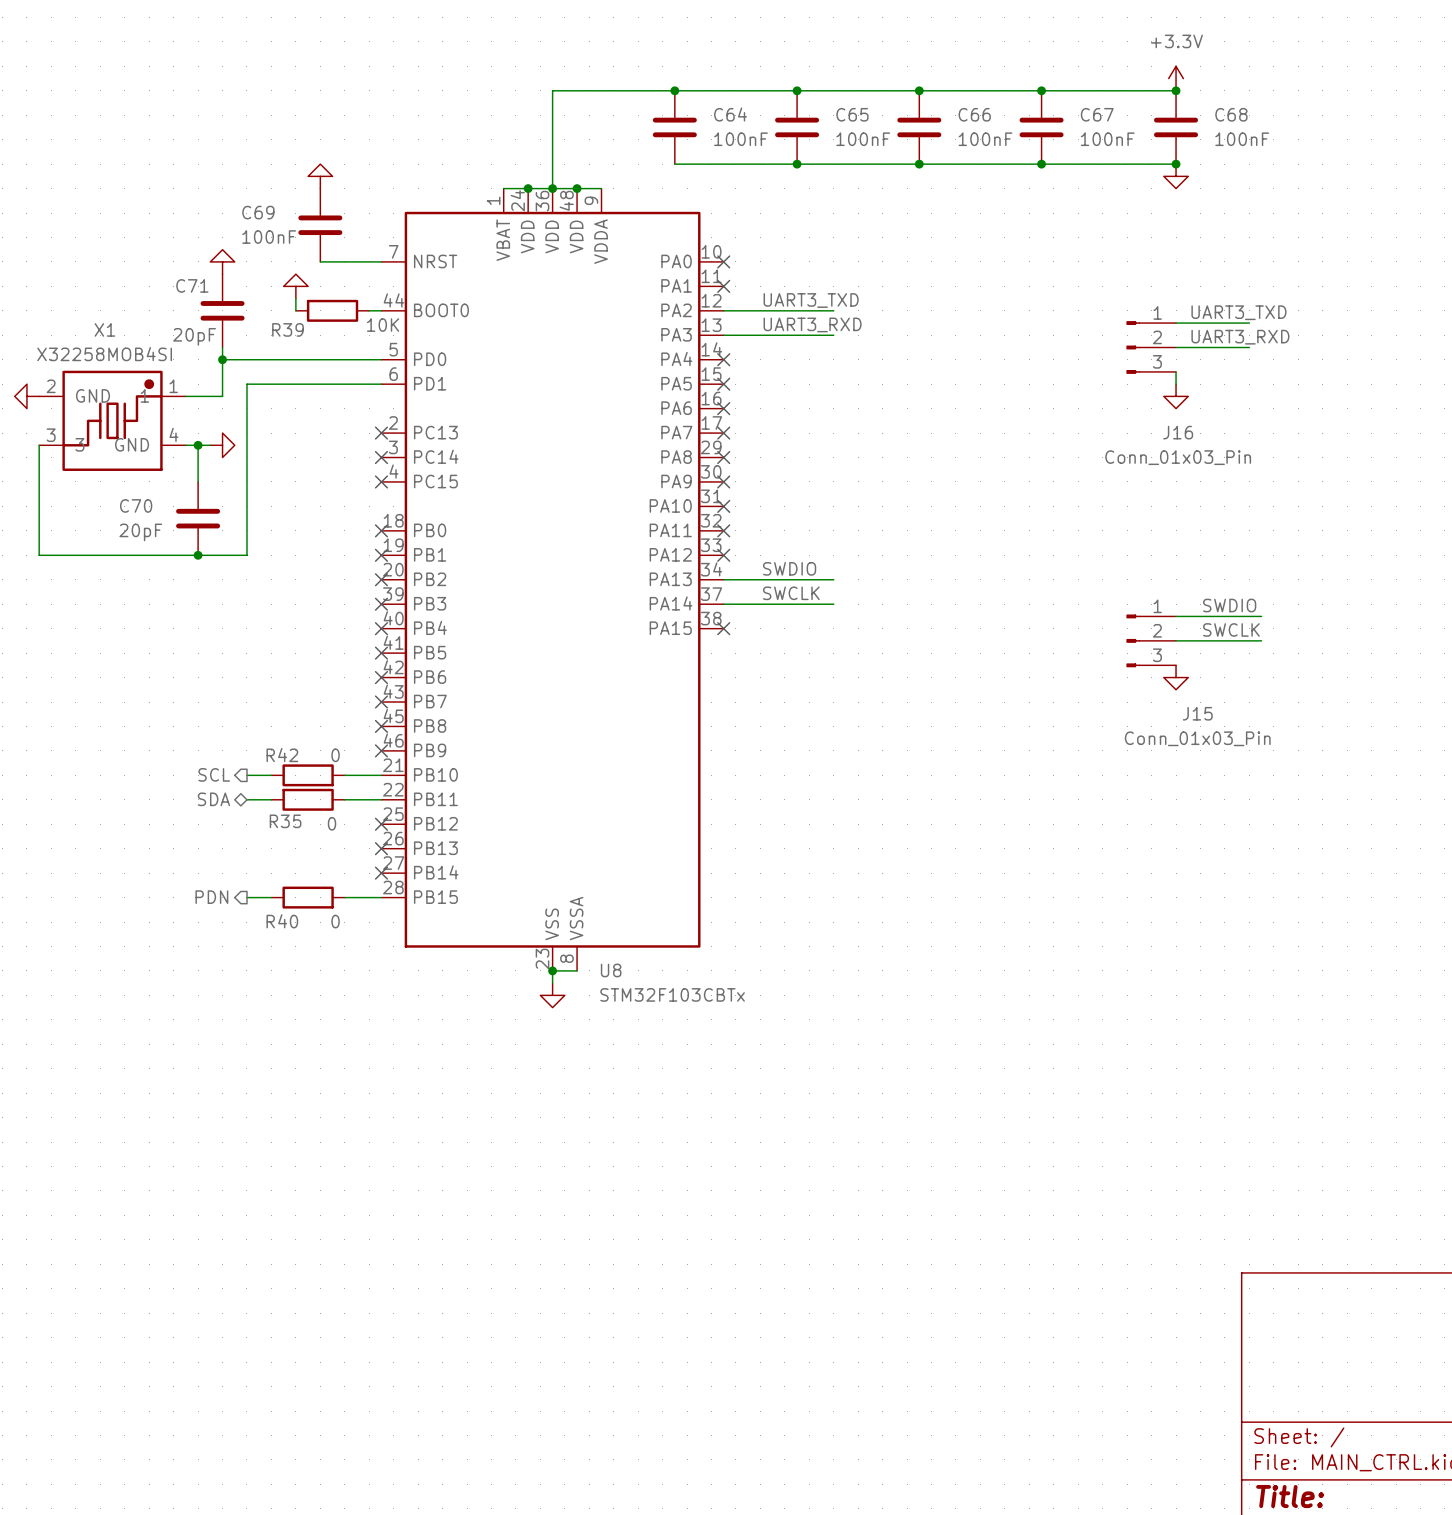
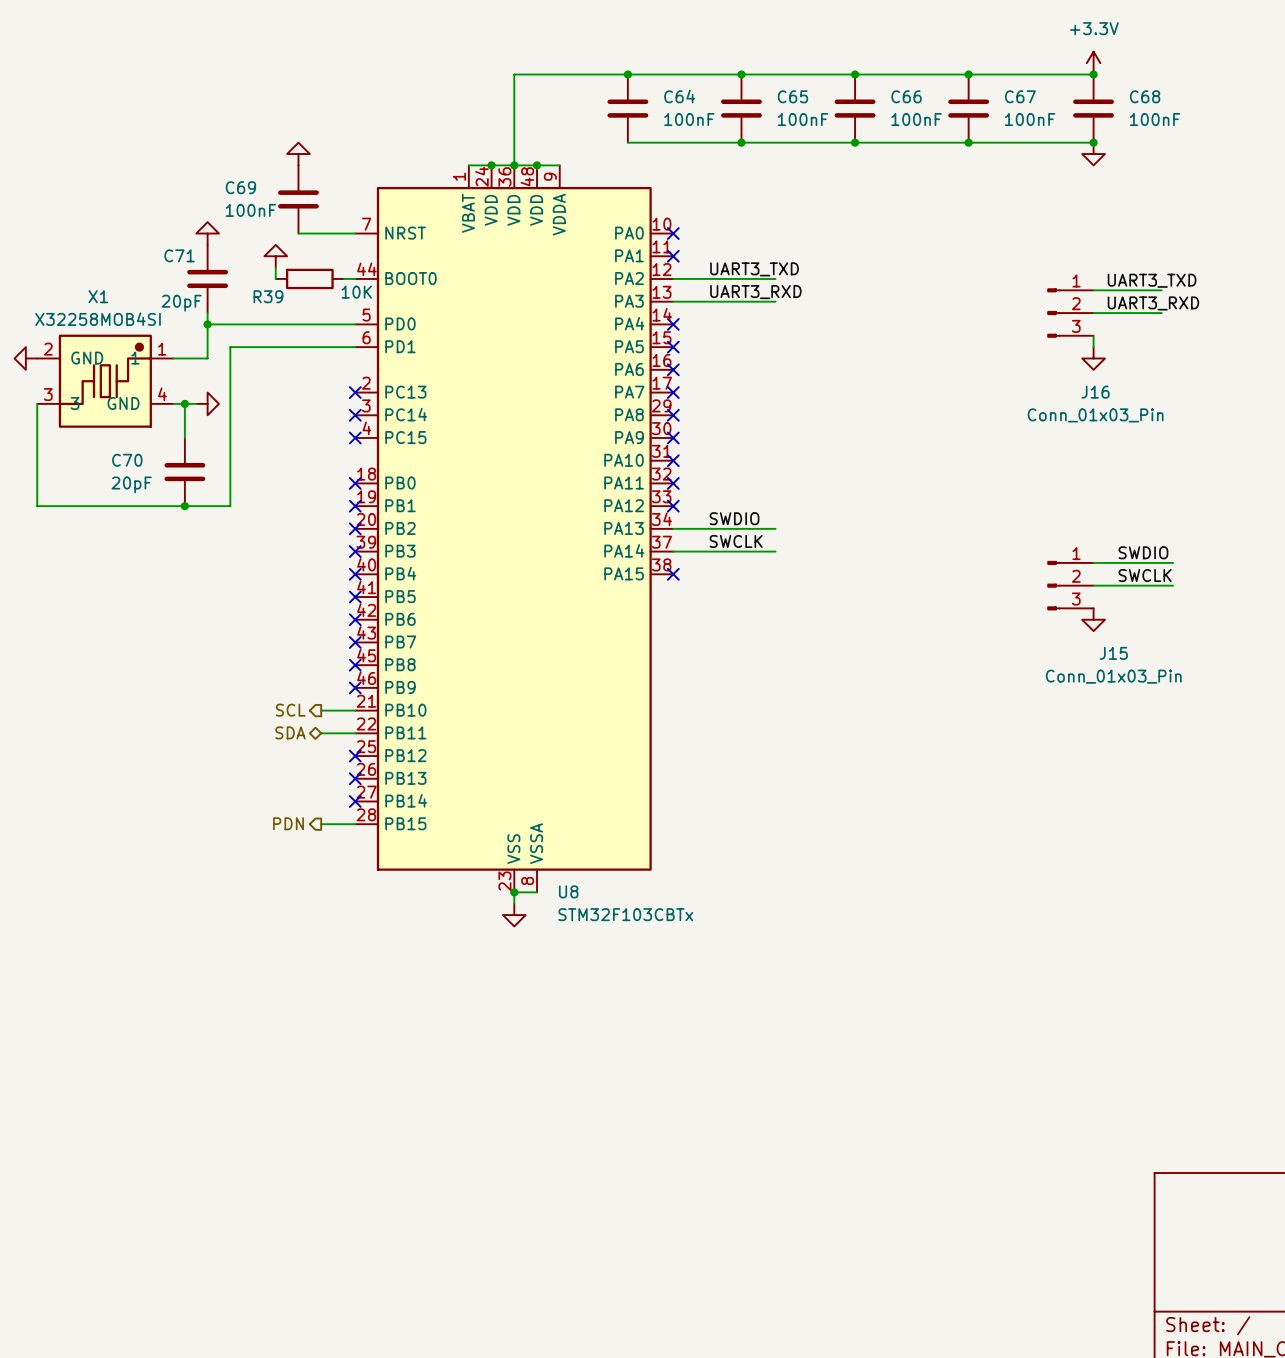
hierarchical label position: SCL (214, 774) -> SCL (290, 710)
wire: (246, 775) (271, 775) -> none
R42: 0 (308, 775) -> none
hierarchical label position: SDA (213, 799) -> SDA (290, 732)
wire: (246, 799) (271, 799) -> none
R35: 0 (308, 799) -> none
hierarchical label position: PDN (211, 897) -> PDN (288, 823)
wire: (246, 897) (271, 897) -> none
R40: 0 (308, 897) -> none

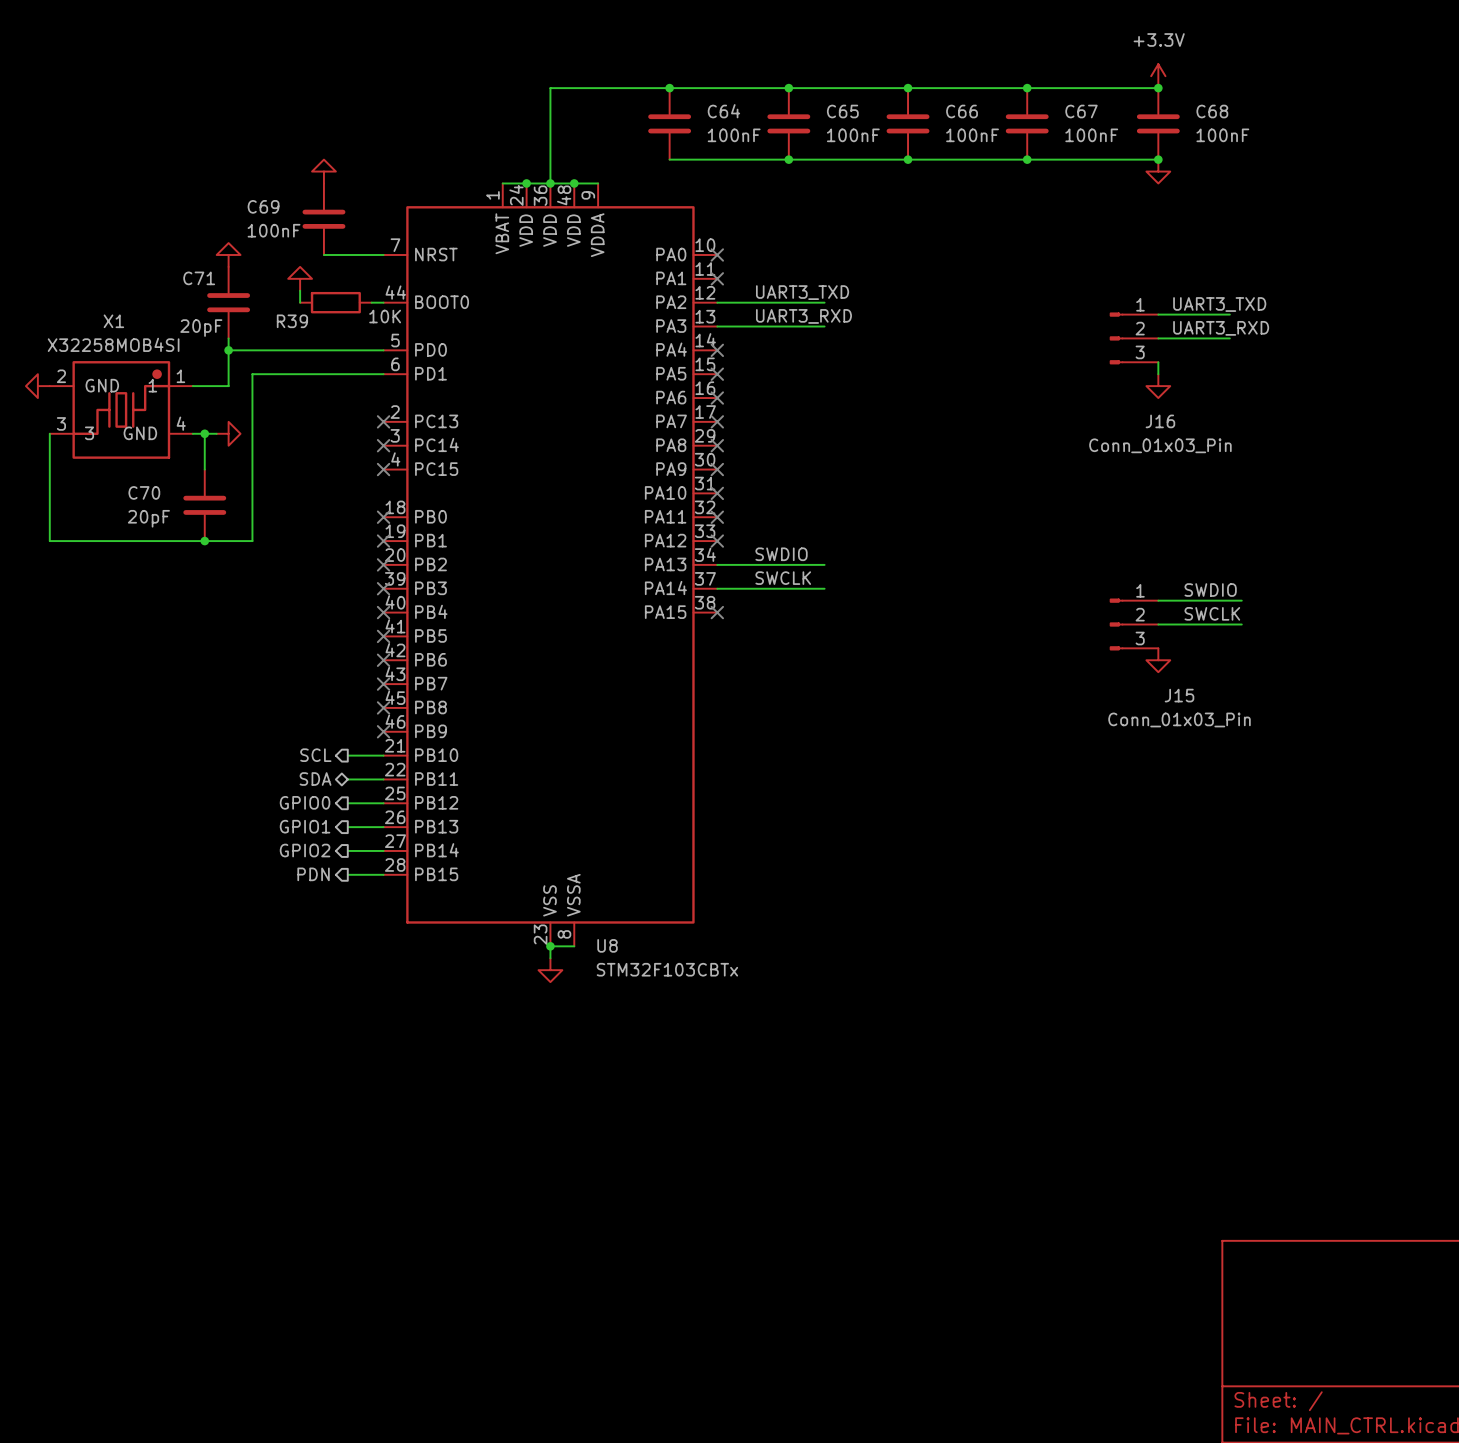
hierarchical label: none -> GPIO0 (305, 802)
wire: none -> (347, 803) (383, 803)
no-connect mark: (355, 756) -> none
hierarchical label: none -> GPIO1 (305, 826)
wire: none -> (347, 827) (383, 827)
no-connect mark: (355, 778) -> none
hierarchical label: none -> GPIO2 (305, 850)
wire: none -> (347, 850) (383, 850)
no-connect mark: (355, 801) -> none

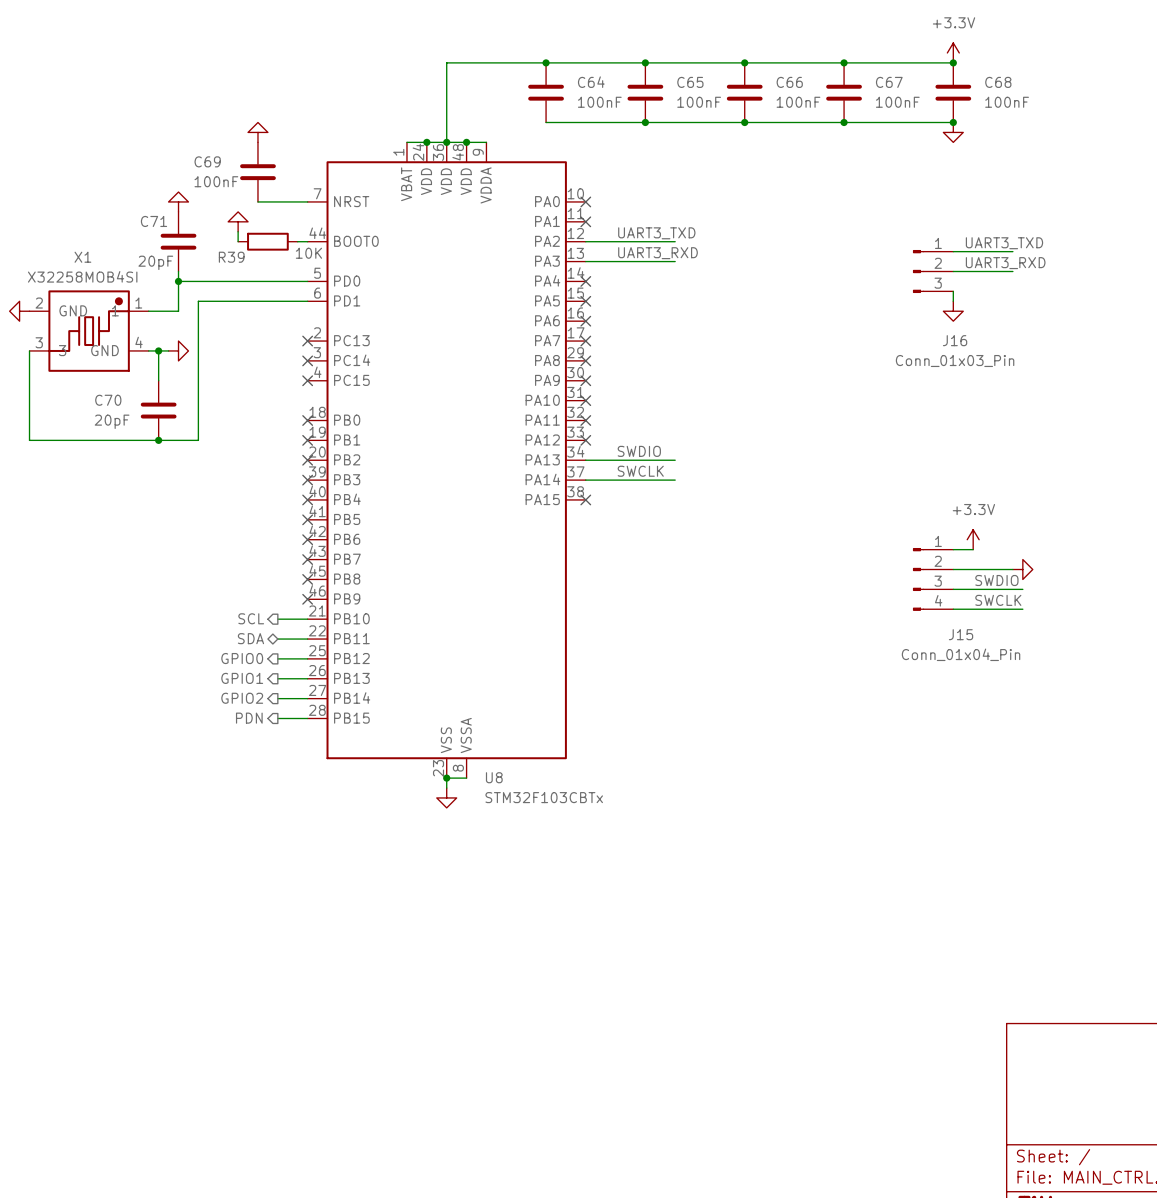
label position: SWDIO (1210, 590) -> SWDIO (996, 580)
J15 symbol: [1109, 598, 1159, 651] -> [912, 548, 954, 611]
wire: (1158, 600) (1241, 600) -> (953, 609) (1022, 609)
label position: SWCLK (1212, 613) -> SWCLK (998, 600)
wire: (1158, 624) (1241, 624) -> (953, 589) (1022, 589)
power symbol rotation: 0° (1158, 660) -> 90° counterclockwise (1022, 569)
power symbol position: (1158, 660) -> (1022, 569)
power symbol: none -> +3.3V (973, 539)
wire: none -> (953, 549) (973, 549)
wire: none -> (953, 569) (1012, 569)
J15 value: Conn_01x03_Pin (1179, 719) -> Conn_01x04_Pin (961, 654)

